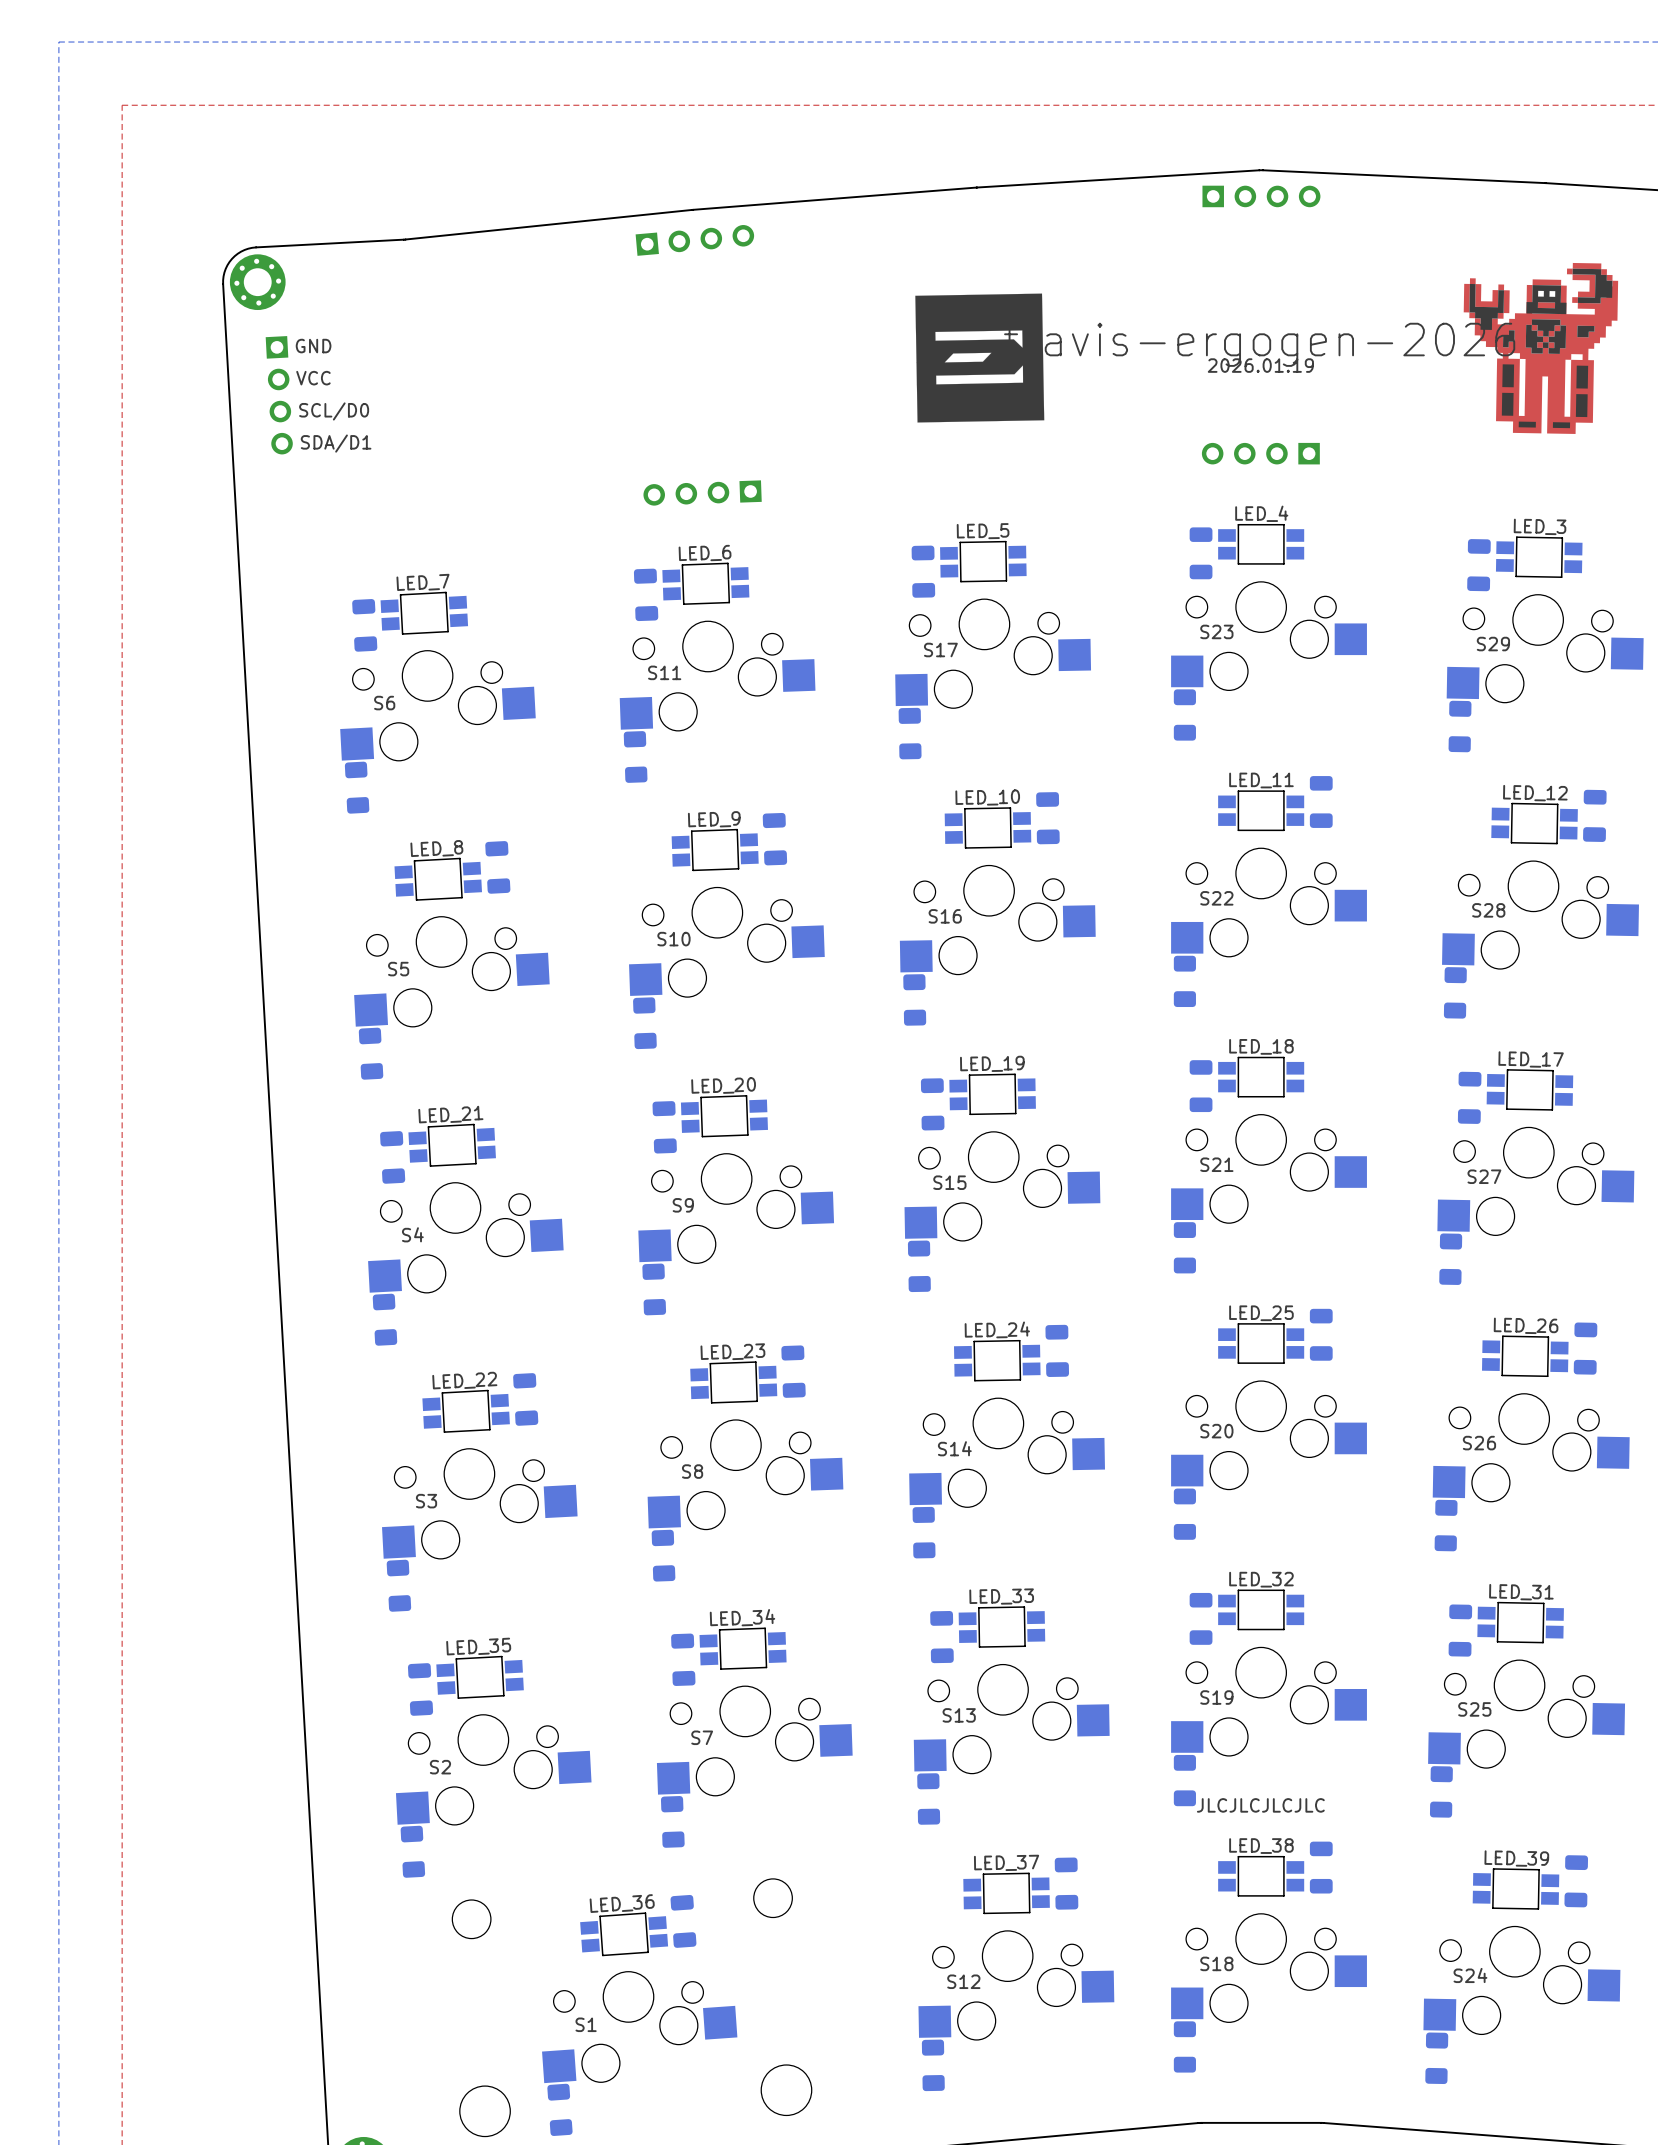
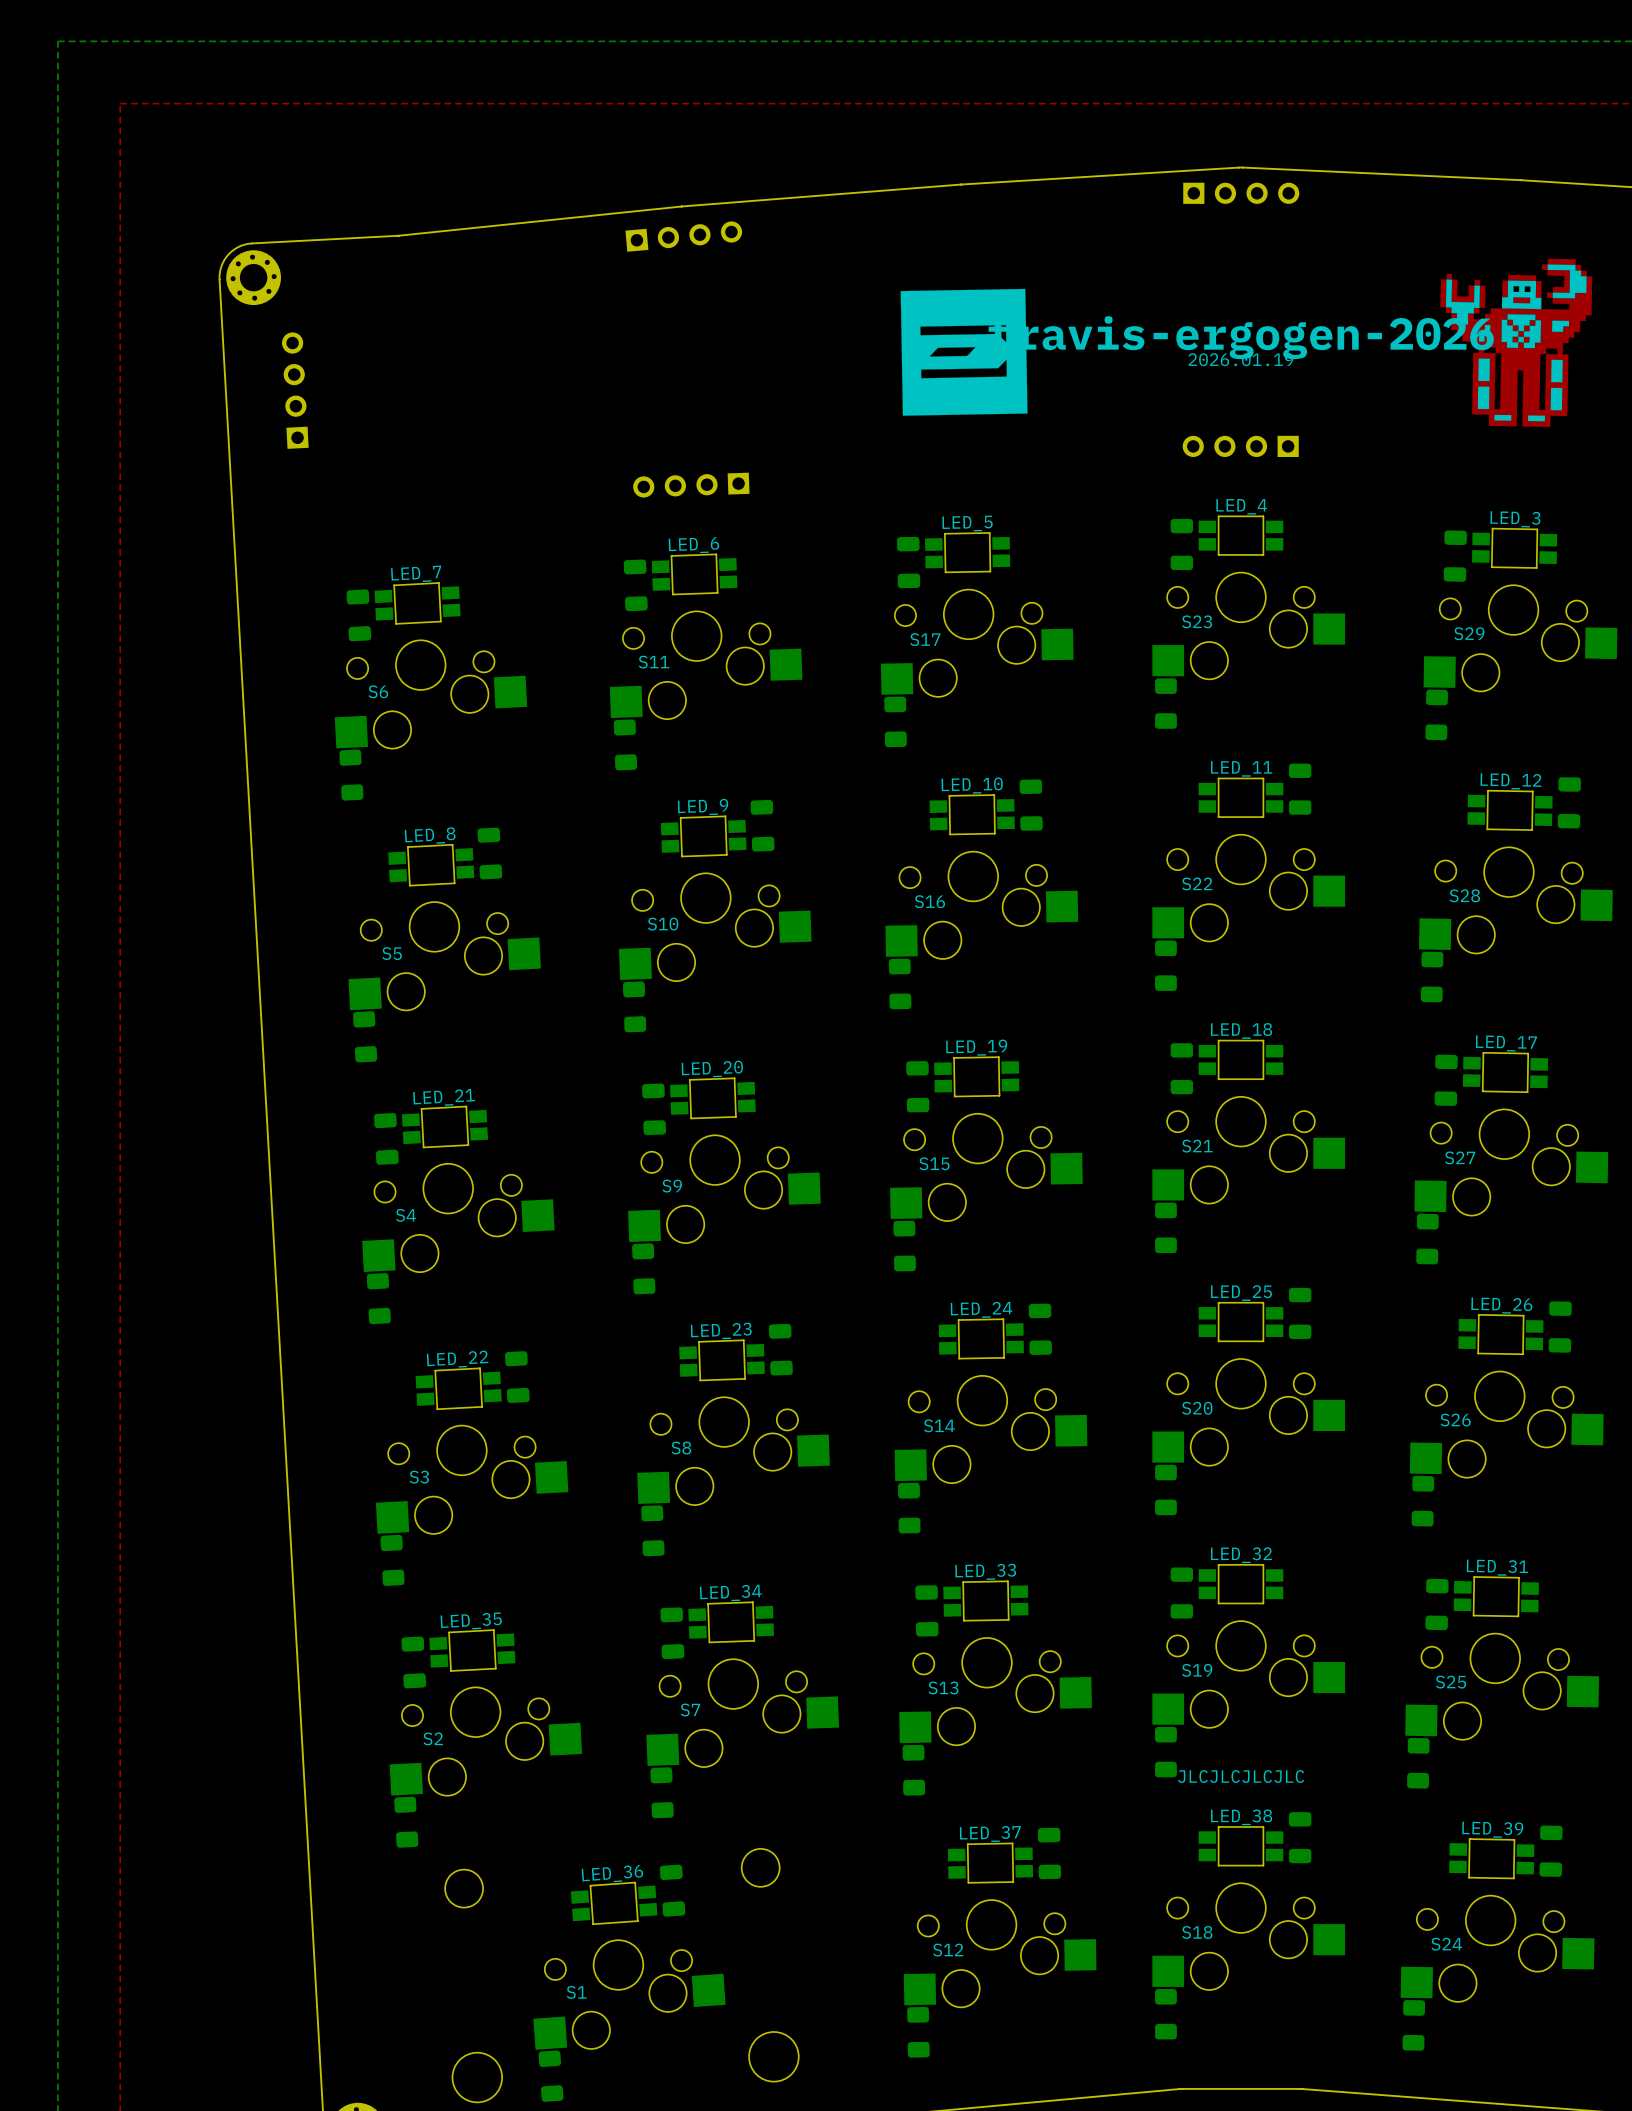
part: (279, 395) -> none
part: none -> (295, 390)

